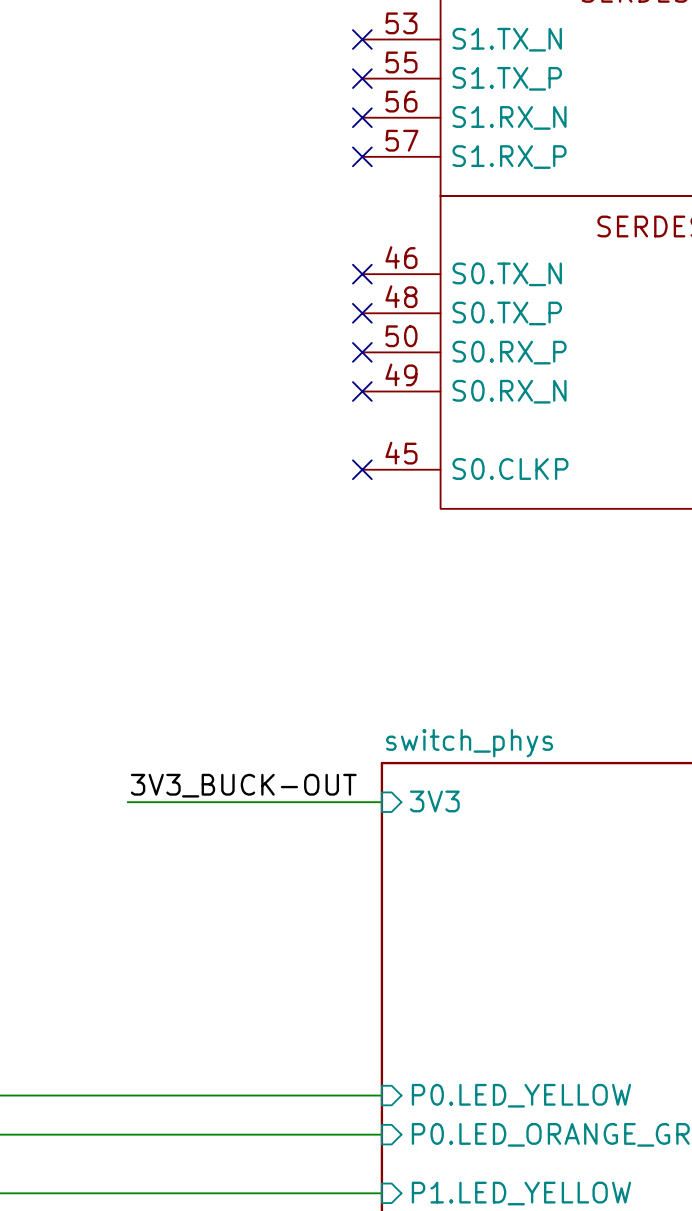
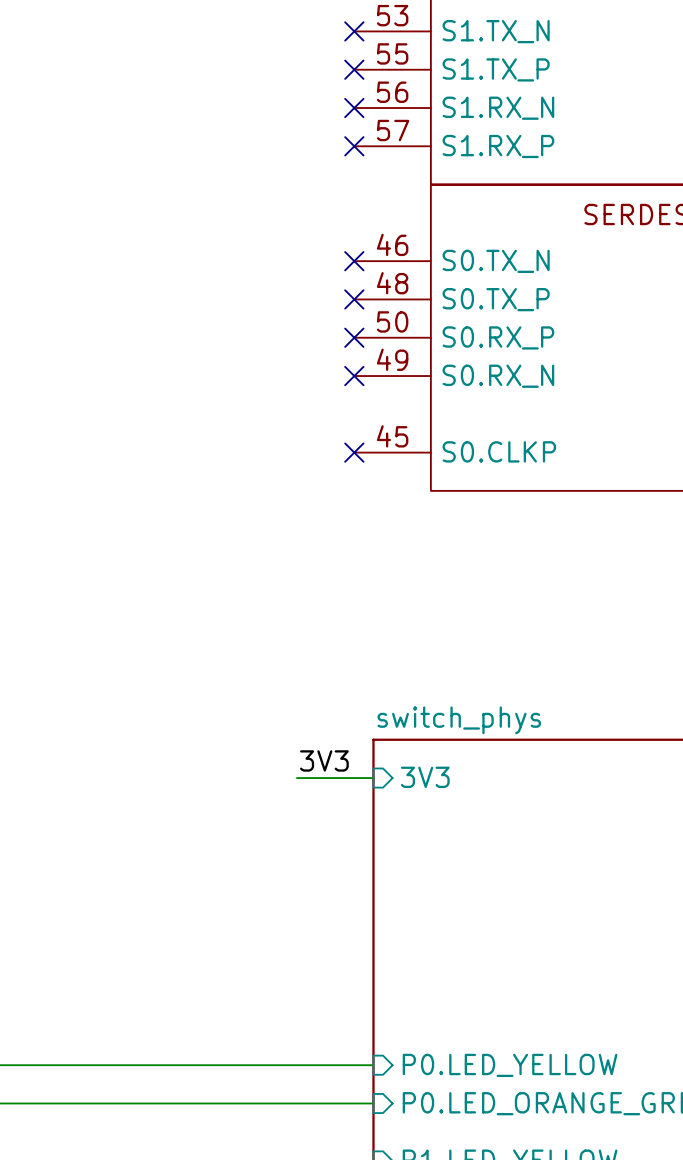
label: none -> 3V3 (324, 760)
label: 3V3_BUCK-OUT (243, 785) -> none
wire: (127, 802) (303, 802) -> none

